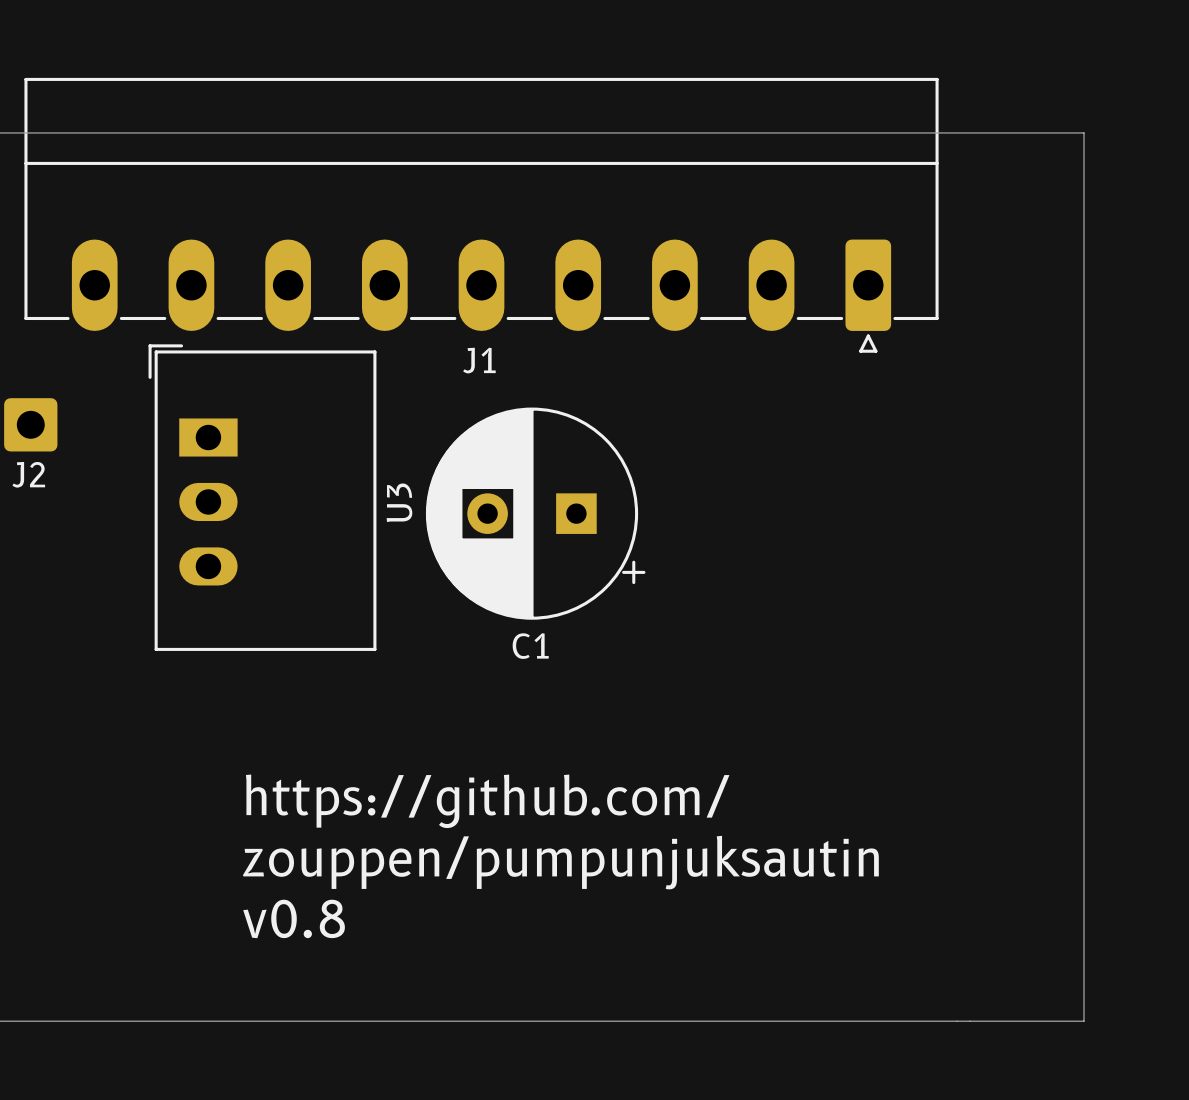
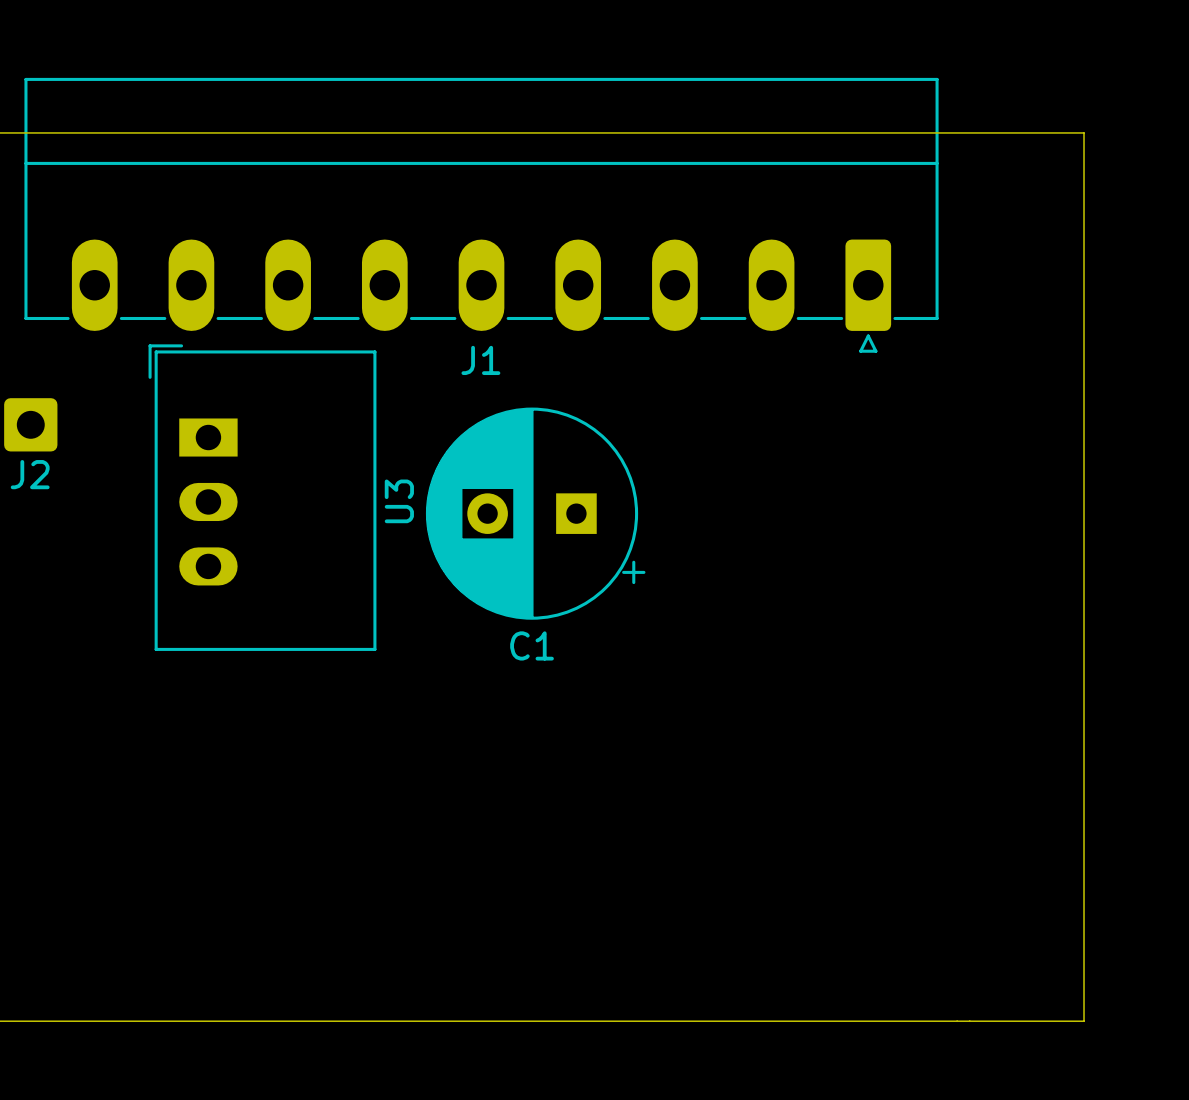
text: https://github.com/ (487, 801) -> none
text: zouppen/pumpunjuksautin (560, 862) -> none
text: v0.8 (294, 918) -> none

